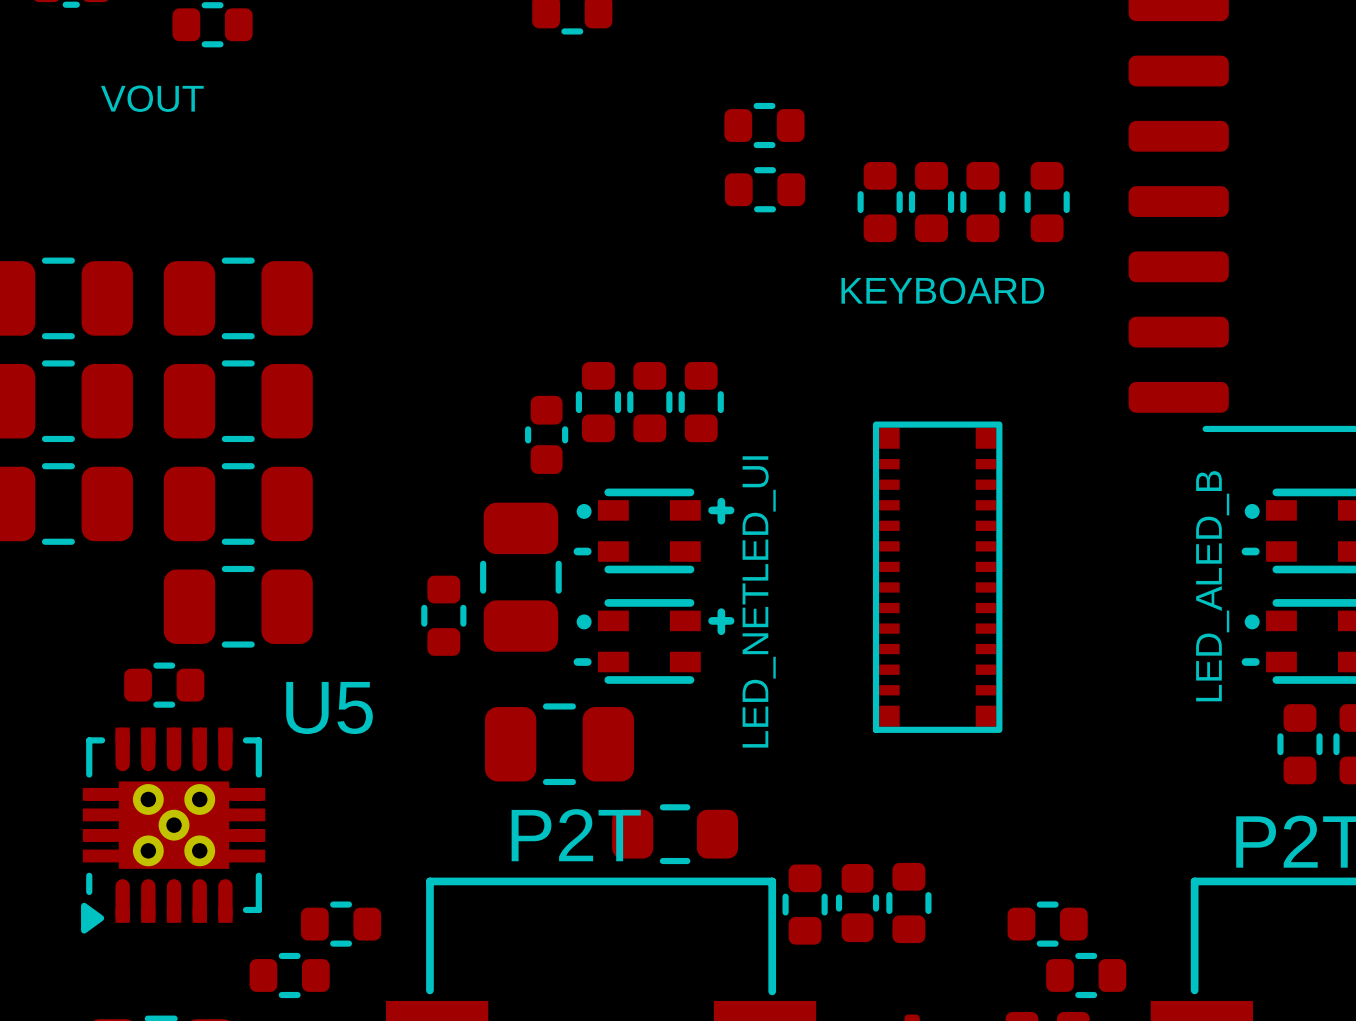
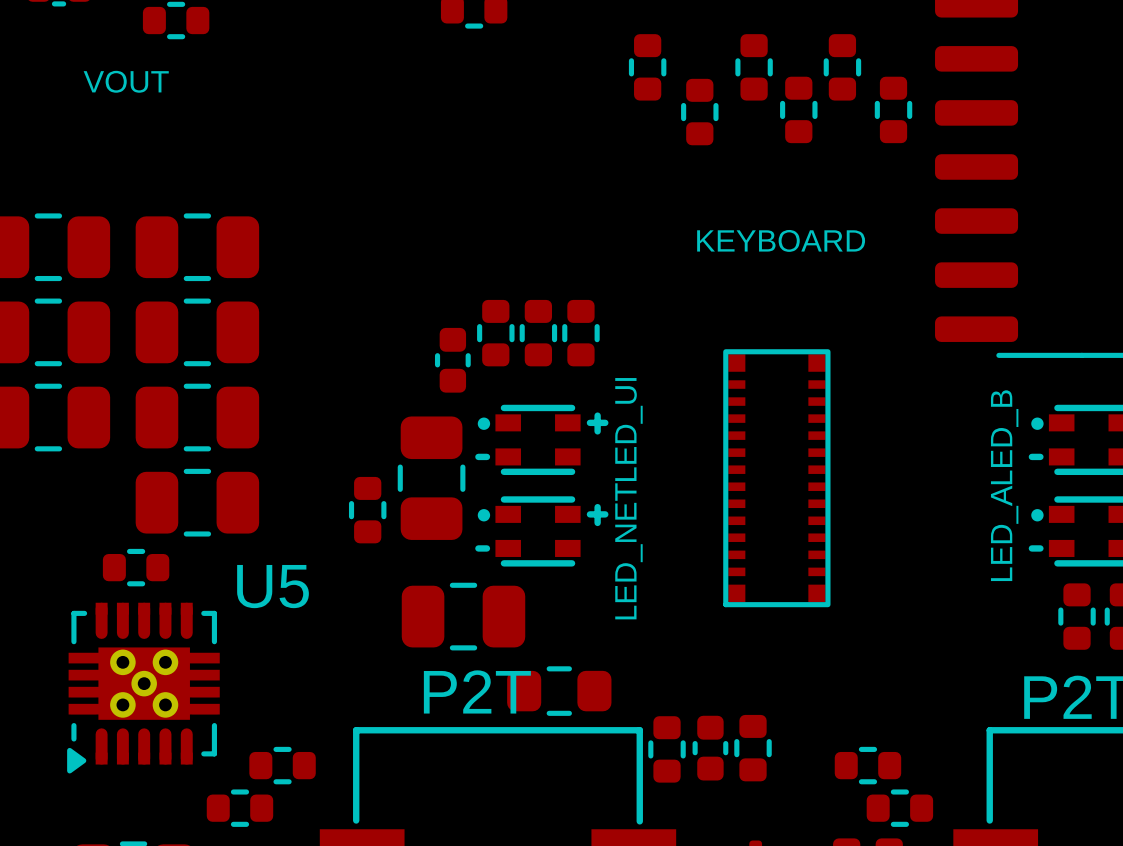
part: none -> (647, 67)
part: none -> (754, 67)
part: none -> (842, 67)
part: (764, 125) -> none
part: none -> (798, 109)
part: none -> (893, 109)
part: none -> (699, 112)
part: (765, 189) -> none
part: (880, 202) -> none
part: (931, 202) -> none
part: (982, 202) -> none
part: (1047, 202) -> none

